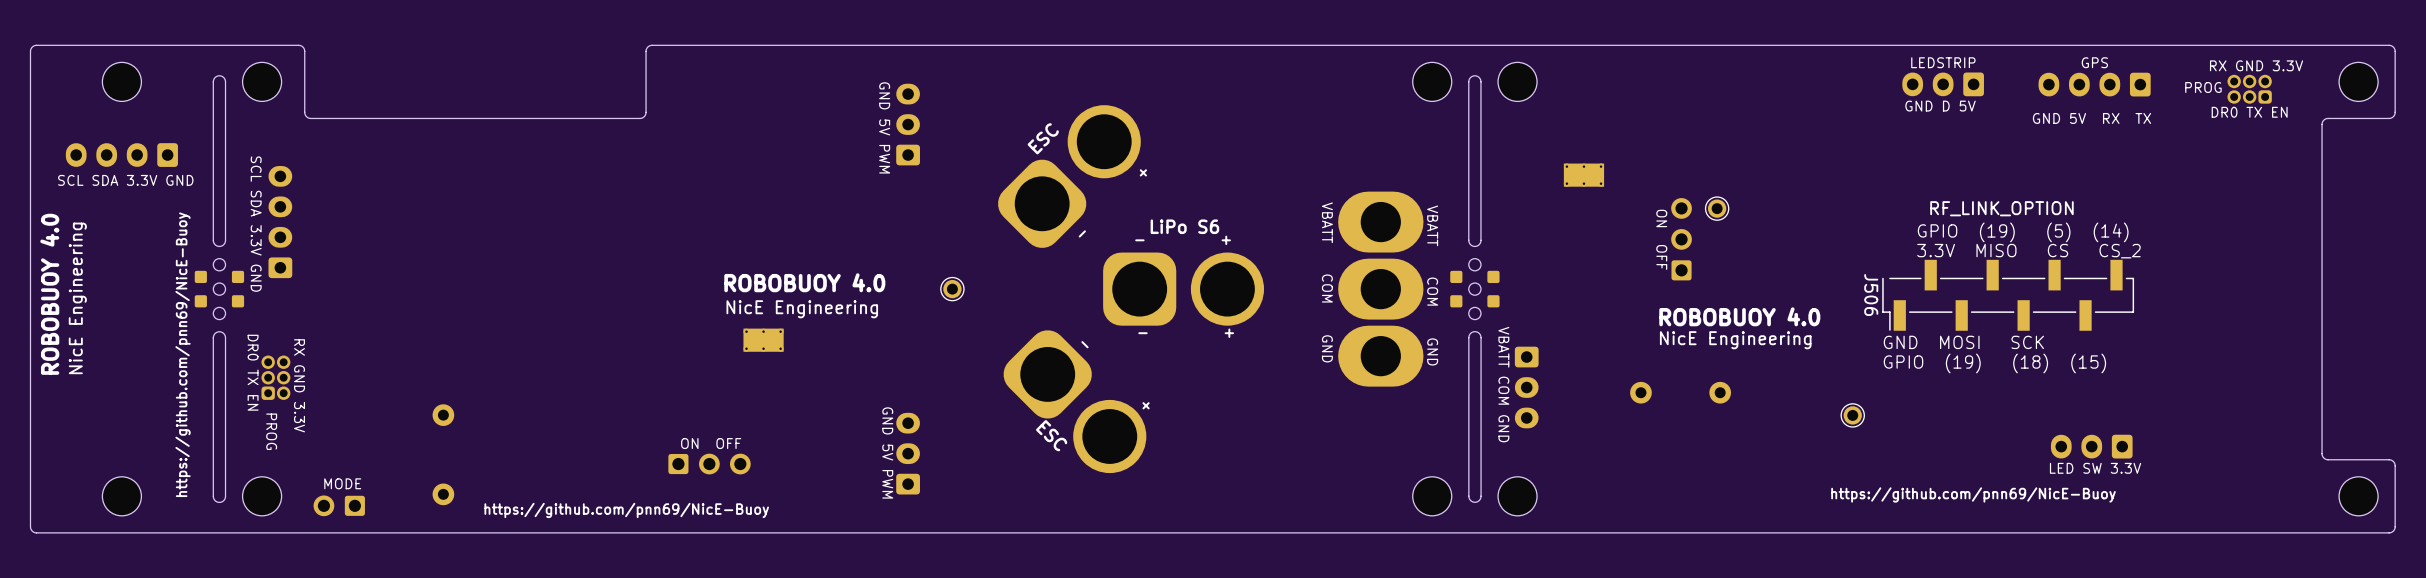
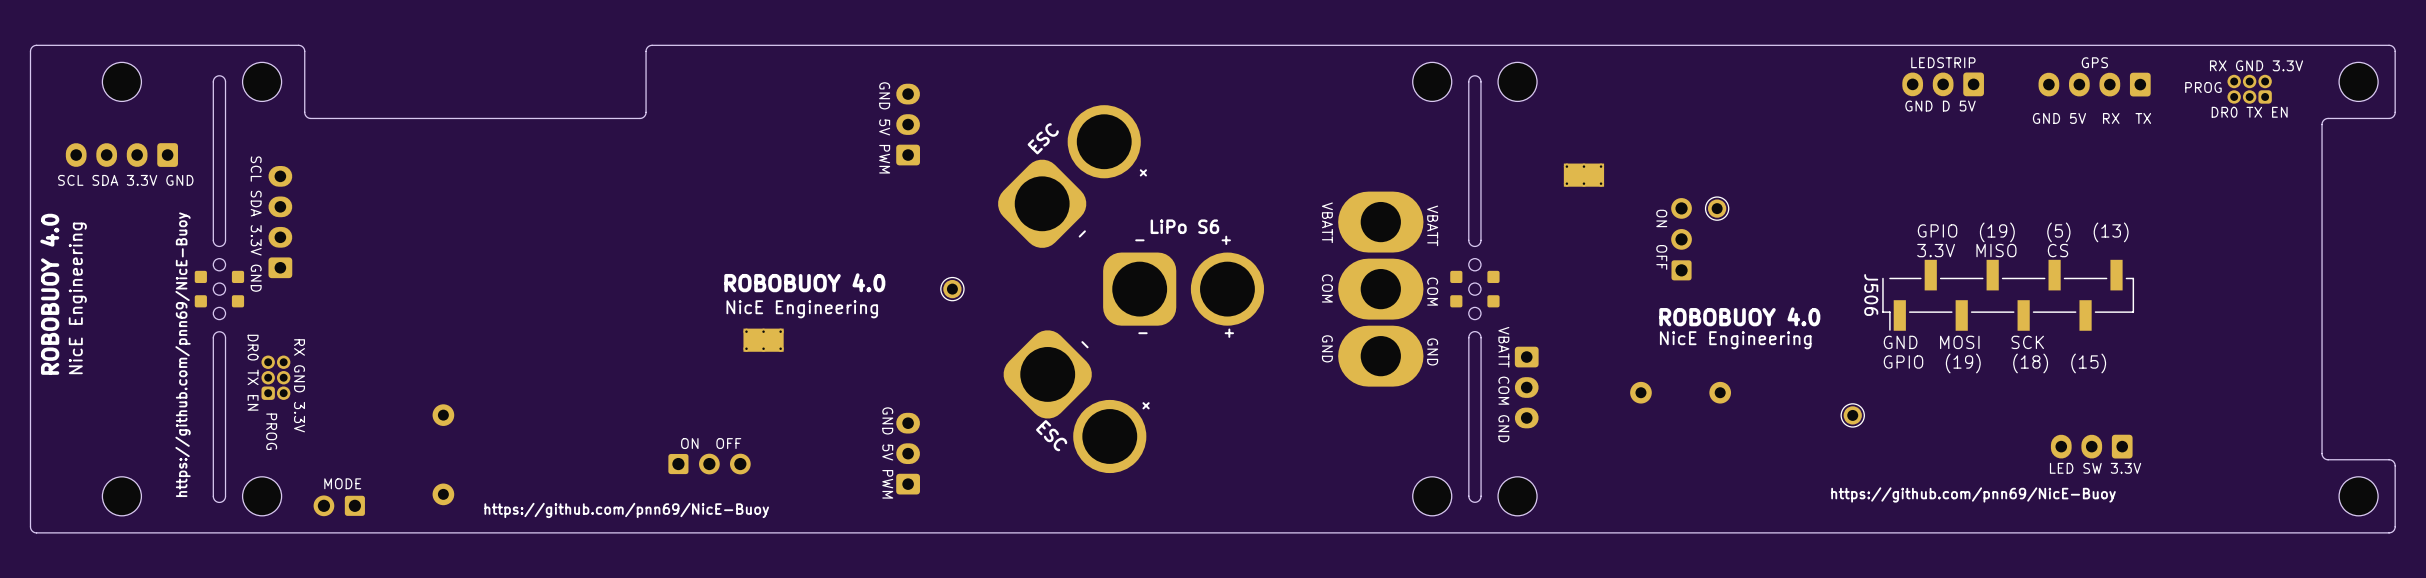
text: RF_LINK_OPTION (2001, 208) -> none
text: GPIO (19) (5) (14) (2023, 232) -> GPIO (19) (5) (13) (2023, 232)
text: 3.3V MISO CS CS_2 (2028, 251) -> 3.3V MISO CS (1992, 250)

